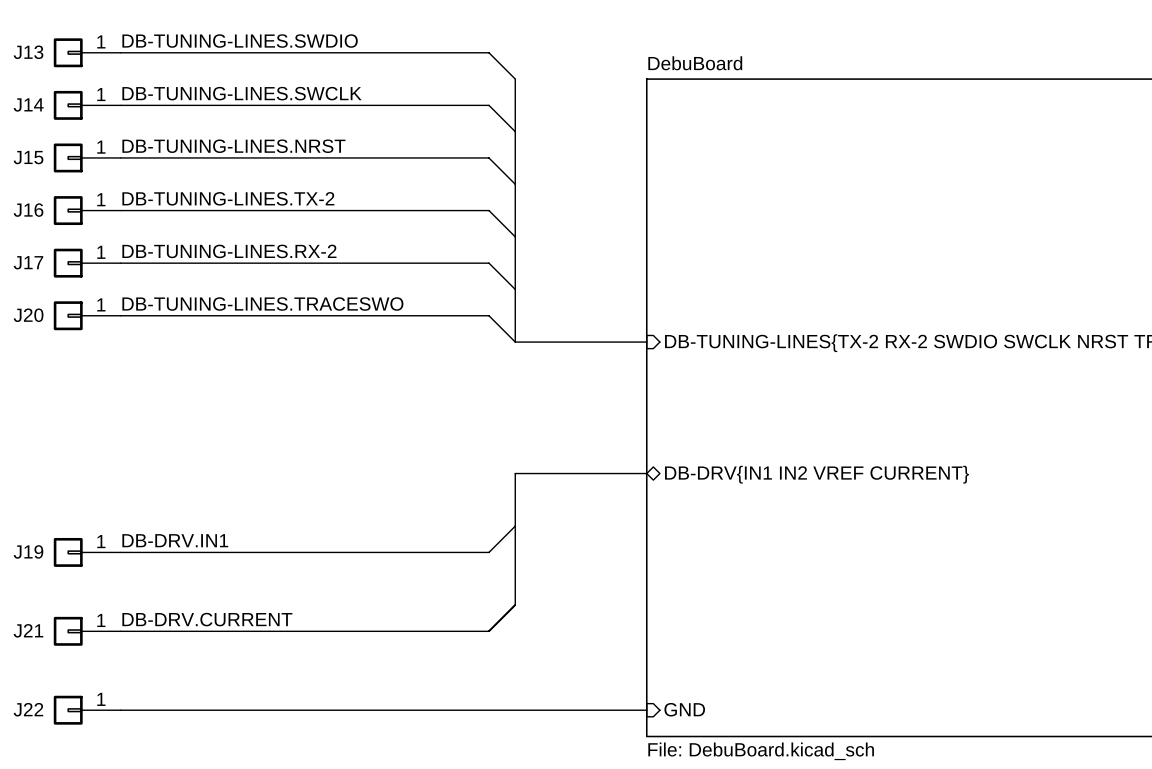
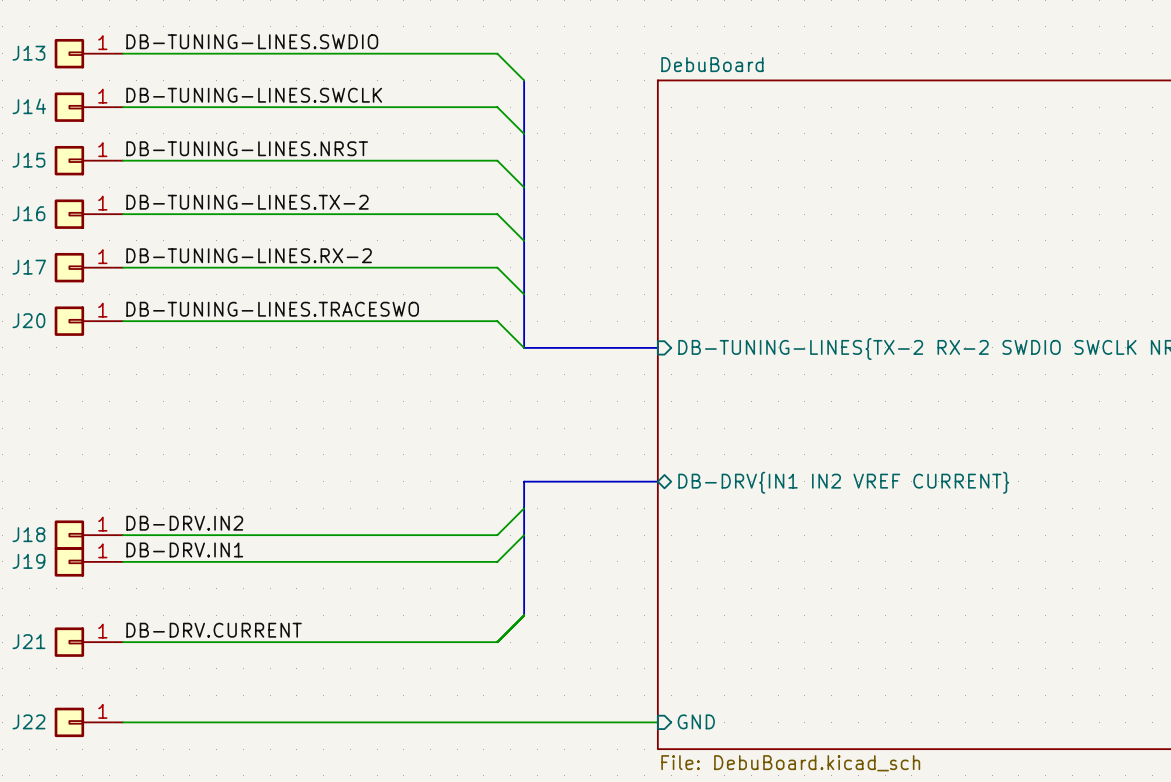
wire: none -> (524, 508) (497, 535) (122, 535)
label: none -> DB-DRV.IN2 (184, 523)
J18: none -> (88, 535)

